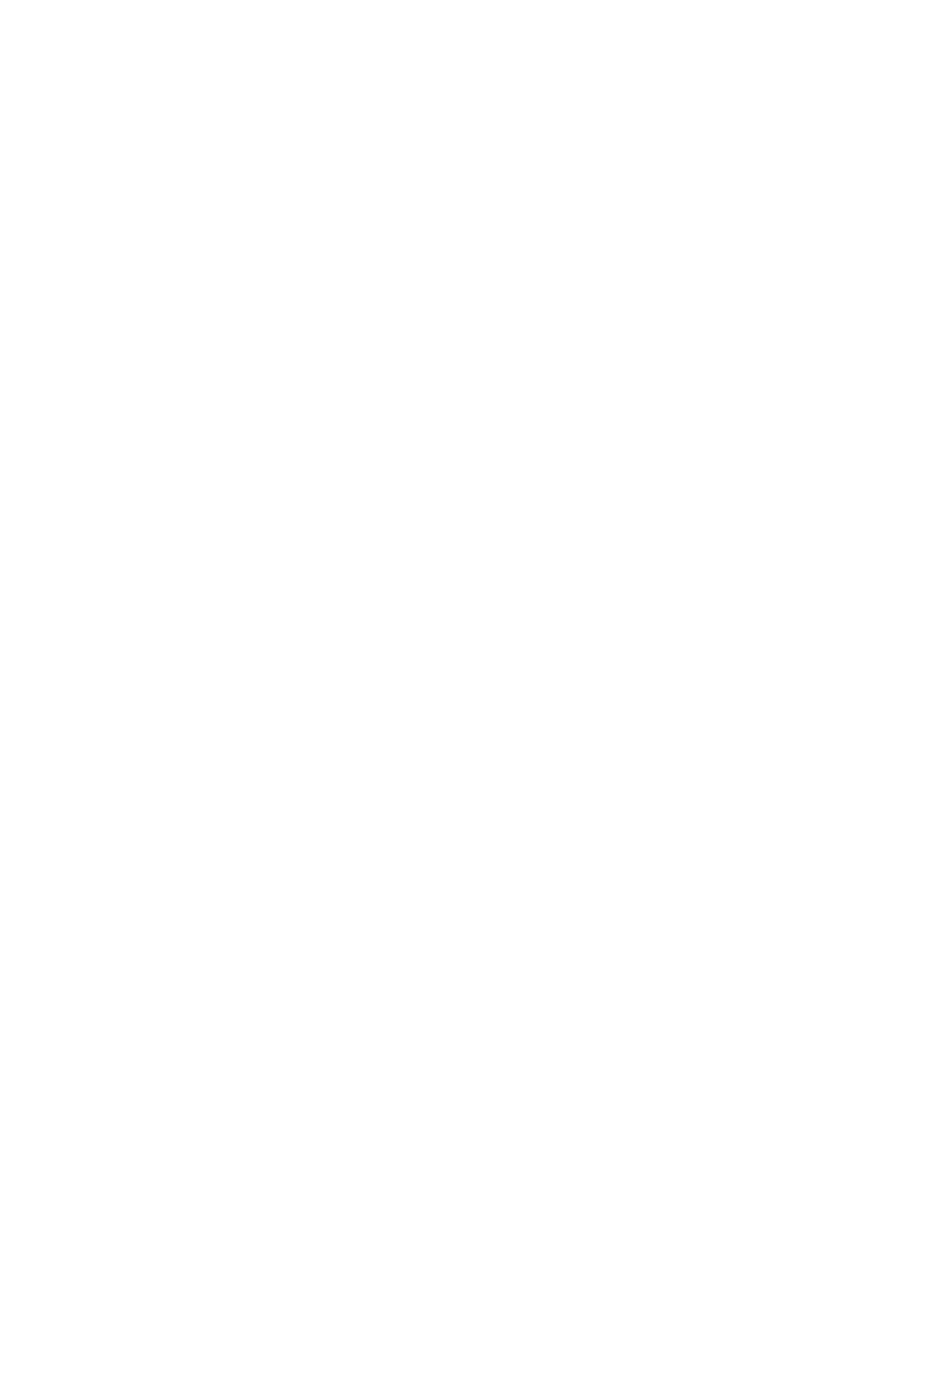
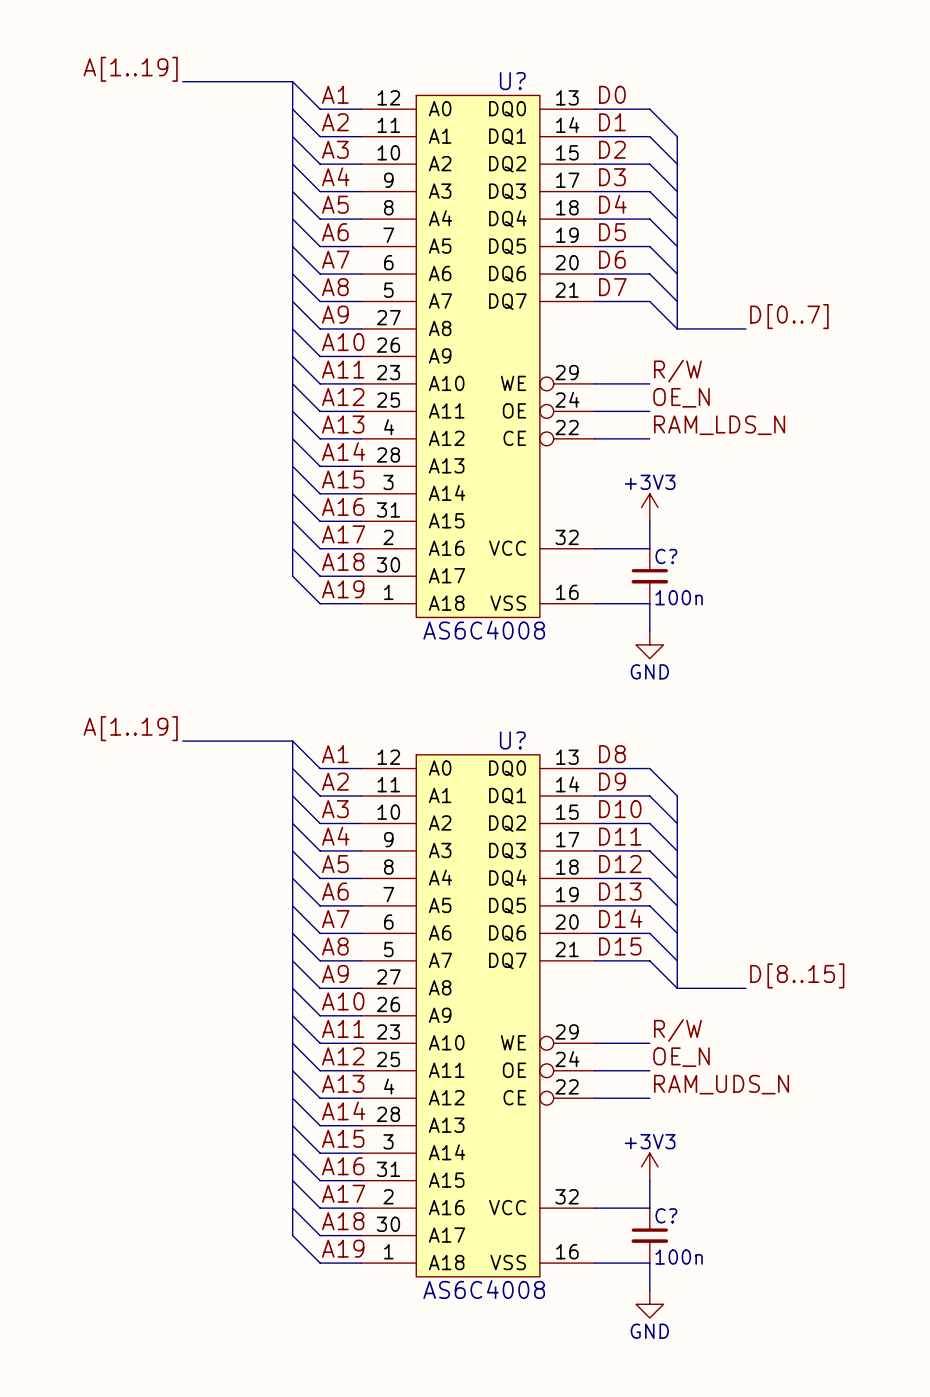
label: none -> A[1..19] (130, 69)
bus: none -> (182, 81) (292, 81) (292, 576)
wire: none -> (292, 81) (320, 109) (361, 109)
label: none -> A1 (335, 94)
label: none -> D0 (612, 94)
wire: none -> (292, 109) (320, 136) (361, 136)
wire: none -> (594, 109) (649, 109) (677, 136)
label: none -> A2 (335, 122)
label: none -> D1 (612, 122)
wire: none -> (292, 136) (320, 164) (361, 164)
wire: none -> (594, 136) (649, 136) (677, 164)
bus: none -> (677, 136) (677, 328) (745, 328)
label: none -> A3 (335, 149)
label: none -> D2 (612, 149)
wire: none -> (292, 164) (320, 191) (361, 191)
wire: none -> (594, 164) (649, 164) (677, 191)
label: none -> A4 (335, 176)
label: none -> D3 (612, 177)
wire: none -> (292, 191) (320, 219) (361, 219)
wire: none -> (594, 191) (649, 191) (677, 219)
label: none -> A5 (335, 204)
label: none -> D4 (612, 204)
wire: none -> (292, 219) (320, 246) (361, 246)
wire: none -> (594, 219) (649, 219) (677, 246)
label: none -> A6 (335, 232)
label: none -> D5 (612, 232)
wire: none -> (292, 246) (320, 274) (361, 274)
wire: none -> (594, 246) (649, 246) (677, 274)
label: none -> A7 (335, 259)
label: none -> D6 (612, 259)
wire: none -> (292, 274) (320, 301) (361, 301)
wire: none -> (594, 274) (649, 274) (677, 301)
label: none -> A8 (335, 287)
label: none -> D7 (612, 287)
wire: none -> (292, 301) (320, 328) (361, 328)
wire: none -> (594, 301) (649, 301) (677, 328)
label: none -> A9 (335, 314)
label: none -> D[0..7] (789, 316)
wire: none -> (292, 328) (320, 356) (361, 356)
label: none -> A10 (343, 342)
wire: none -> (292, 356) (320, 383) (361, 383)
U?: none -> AS6C4008 (478, 356)
label: none -> A11 (343, 369)
label: none -> R/W (677, 371)
wire: none -> (292, 383) (320, 411) (361, 411)
wire: none -> (594, 383) (649, 383)
label: none -> A12 (343, 397)
label: none -> OE_N (681, 397)
wire: none -> (292, 411) (320, 438) (361, 438)
wire: none -> (594, 411) (649, 411)
label: none -> A13 (343, 424)
label: none -> RAM_LDS_N (719, 425)
wire: none -> (292, 438) (320, 466) (361, 466)
wire: none -> (594, 438) (649, 438)
label: none -> A14 (343, 451)
wire: none -> (292, 466) (320, 493) (361, 493)
label: none -> A15 (343, 479)
wire: none -> (292, 493) (320, 521) (361, 521)
label: none -> A16 (343, 506)
power symbol: none -> +3V3 (649, 507)
wire: none -> (292, 521) (320, 548) (361, 548)
wire: none -> (649, 521) (649, 548) (594, 548)
label: none -> A17 (343, 534)
wire: none -> (292, 548) (320, 576) (361, 576)
label: none -> A18 (343, 561)
wire: none -> (292, 576) (320, 603) (361, 603)
C?: none -> 100n (649, 576)
label: none -> A19 (343, 589)
wire: none -> (594, 603) (649, 603) (649, 631)
power symbol: none -> GND (649, 644)
label: none -> A[1..19] (130, 728)
bus: none -> (182, 741) (292, 741) (292, 1235)
wire: none -> (292, 741) (320, 768) (361, 768)
label: none -> A1 (335, 754)
label: none -> D8 (612, 754)
wire: none -> (292, 768) (320, 796) (361, 796)
wire: none -> (594, 768) (649, 768) (677, 796)
label: none -> A2 (335, 781)
label: none -> D9 (612, 781)
wire: none -> (292, 796) (320, 823) (361, 823)
wire: none -> (594, 796) (649, 796) (677, 823)
bus: none -> (677, 796) (677, 988) (745, 988)
label: none -> A3 (335, 809)
label: none -> D10 (620, 809)
wire: none -> (292, 823) (320, 850) (361, 850)
wire: none -> (594, 823) (649, 823) (677, 850)
label: none -> A4 (335, 836)
label: none -> D11 (620, 836)
wire: none -> (292, 850) (320, 878) (361, 878)
wire: none -> (594, 850) (649, 850) (677, 878)
label: none -> A5 (335, 864)
label: none -> D12 (620, 864)
wire: none -> (292, 878) (320, 905) (361, 905)
wire: none -> (594, 878) (649, 878) (677, 905)
label: none -> A6 (335, 891)
label: none -> D13 (620, 891)
wire: none -> (292, 905) (320, 933) (361, 933)
wire: none -> (594, 905) (649, 905) (677, 933)
label: none -> D14 (620, 918)
label: none -> A7 (335, 919)
wire: none -> (292, 933) (320, 960) (361, 960)
wire: none -> (594, 933) (649, 933) (677, 960)
label: none -> A8 (335, 946)
label: none -> D15 (620, 946)
wire: none -> (292, 960) (320, 988) (361, 988)
wire: none -> (594, 960) (649, 960) (677, 988)
label: none -> A9 (335, 973)
label: none -> D[8..15] (797, 975)
wire: none -> (292, 988) (320, 1015) (361, 1015)
label: none -> A10 (343, 1001)
wire: none -> (292, 1015) (320, 1043) (361, 1043)
U?: none -> AS6C4008 (478, 1015)
label: none -> A11 (343, 1028)
label: none -> R/W (677, 1030)
wire: none -> (292, 1043) (320, 1070) (361, 1070)
wire: none -> (594, 1043) (649, 1043)
label: none -> A12 (343, 1056)
label: none -> OE_N (681, 1057)
wire: none -> (292, 1070) (320, 1098) (361, 1098)
wire: none -> (594, 1070) (649, 1070)
label: none -> A13 (343, 1083)
label: none -> RAM_UDS_N (721, 1084)
wire: none -> (292, 1098) (320, 1125) (361, 1125)
wire: none -> (594, 1098) (649, 1098)
label: none -> A14 (343, 1110)
wire: none -> (292, 1125) (320, 1153) (361, 1153)
label: none -> A15 (343, 1138)
wire: none -> (292, 1153) (320, 1180) (361, 1180)
label: none -> A16 (343, 1166)
power symbol: none -> +3V3 (649, 1166)
wire: none -> (292, 1180) (320, 1208) (361, 1208)
wire: none -> (649, 1180) (649, 1208) (594, 1208)
label: none -> A17 (343, 1193)
wire: none -> (292, 1208) (320, 1235) (361, 1235)
label: none -> A18 (343, 1221)
wire: none -> (292, 1235) (320, 1263) (361, 1263)
C?: none -> 100n (649, 1235)
label: none -> A19 (343, 1248)
wire: none -> (594, 1263) (649, 1263) (649, 1290)
power symbol: none -> GND (649, 1304)

